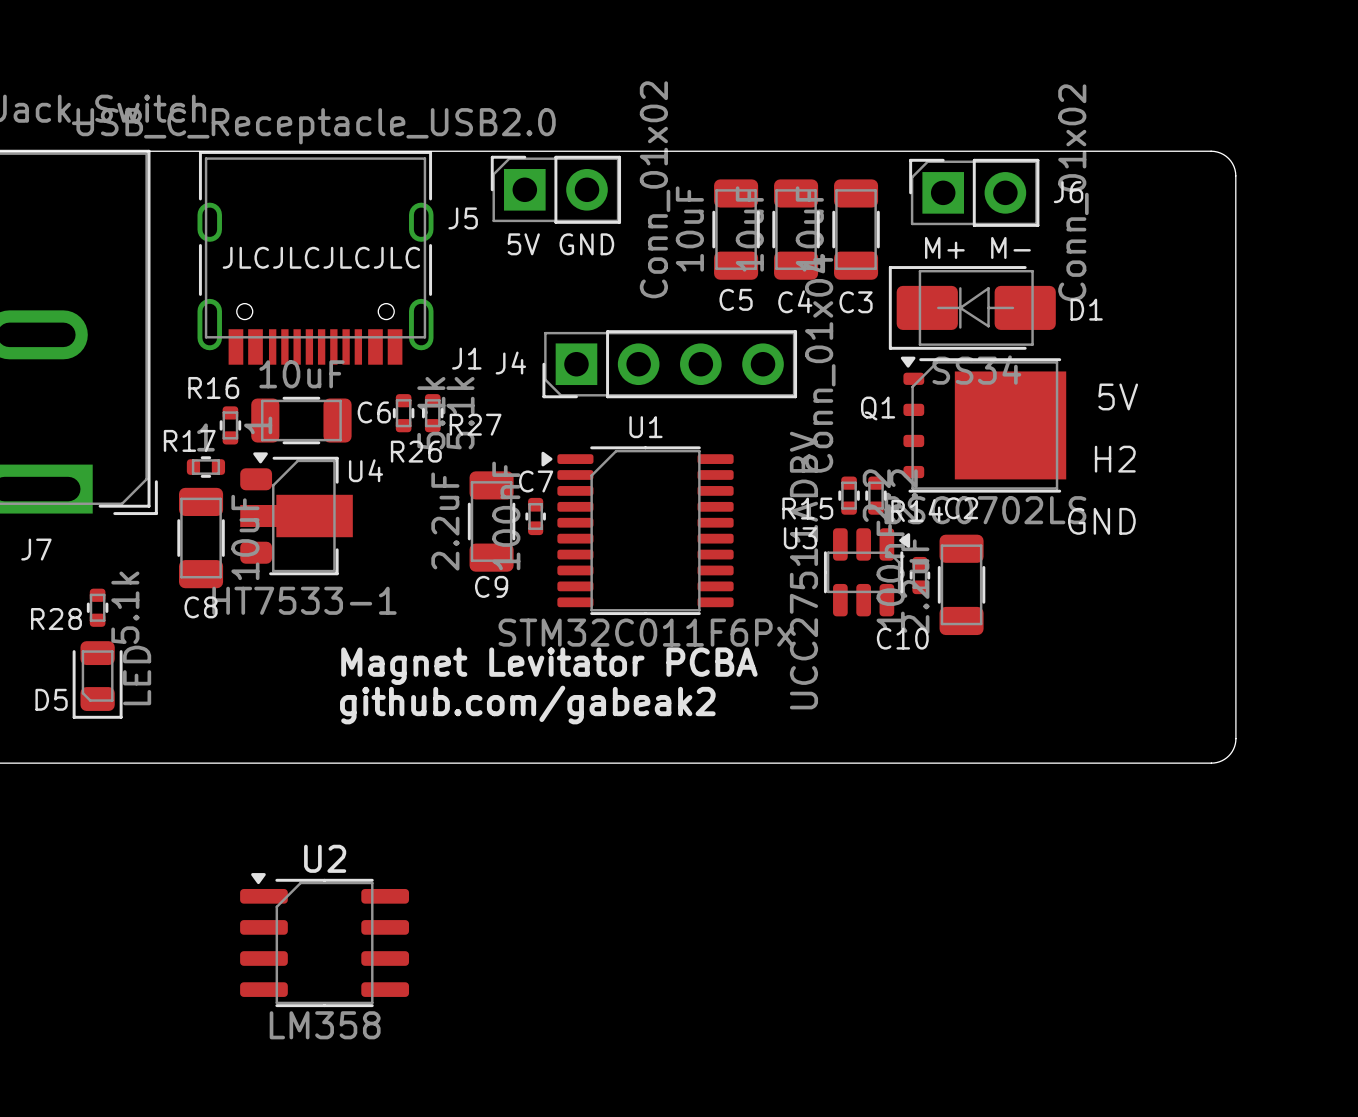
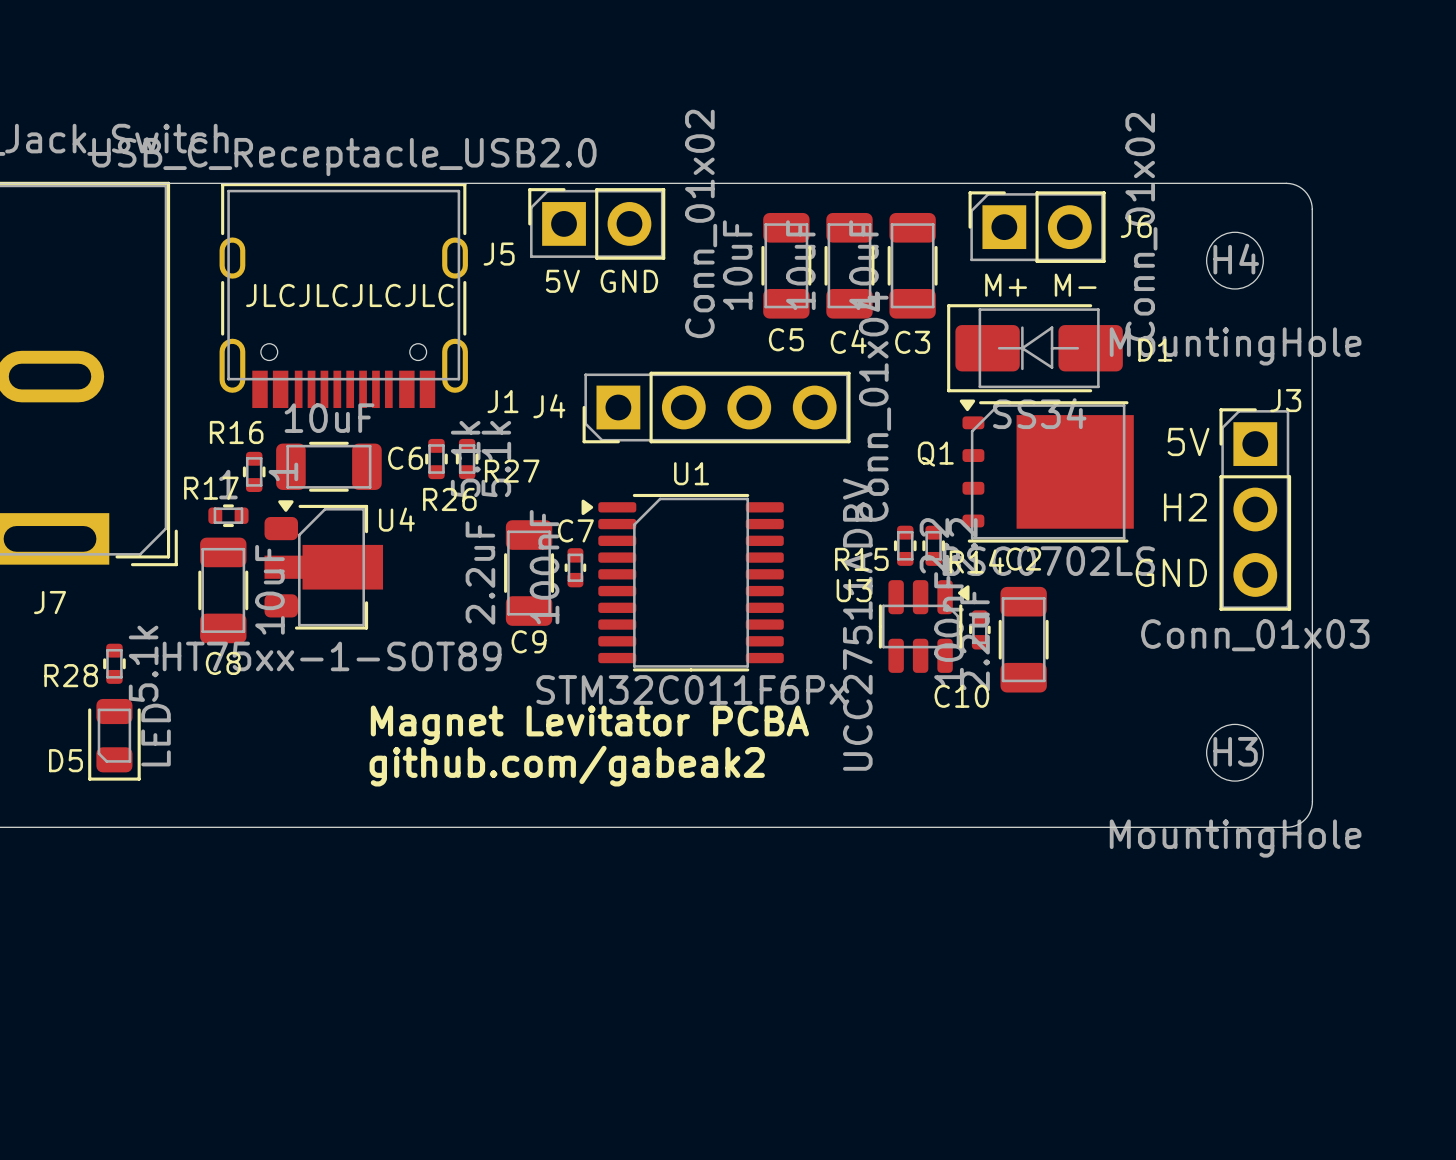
H4: none -> MountingHole (1234, 260)
J3: none -> Conn_01x03 (1255, 509)
U4 value: HT7533-1 (304, 600) -> HT75xx-1-SOT89 (332, 656)
H3: none -> MountingHole (1234, 752)
U2: LM358 (324, 940) -> none

